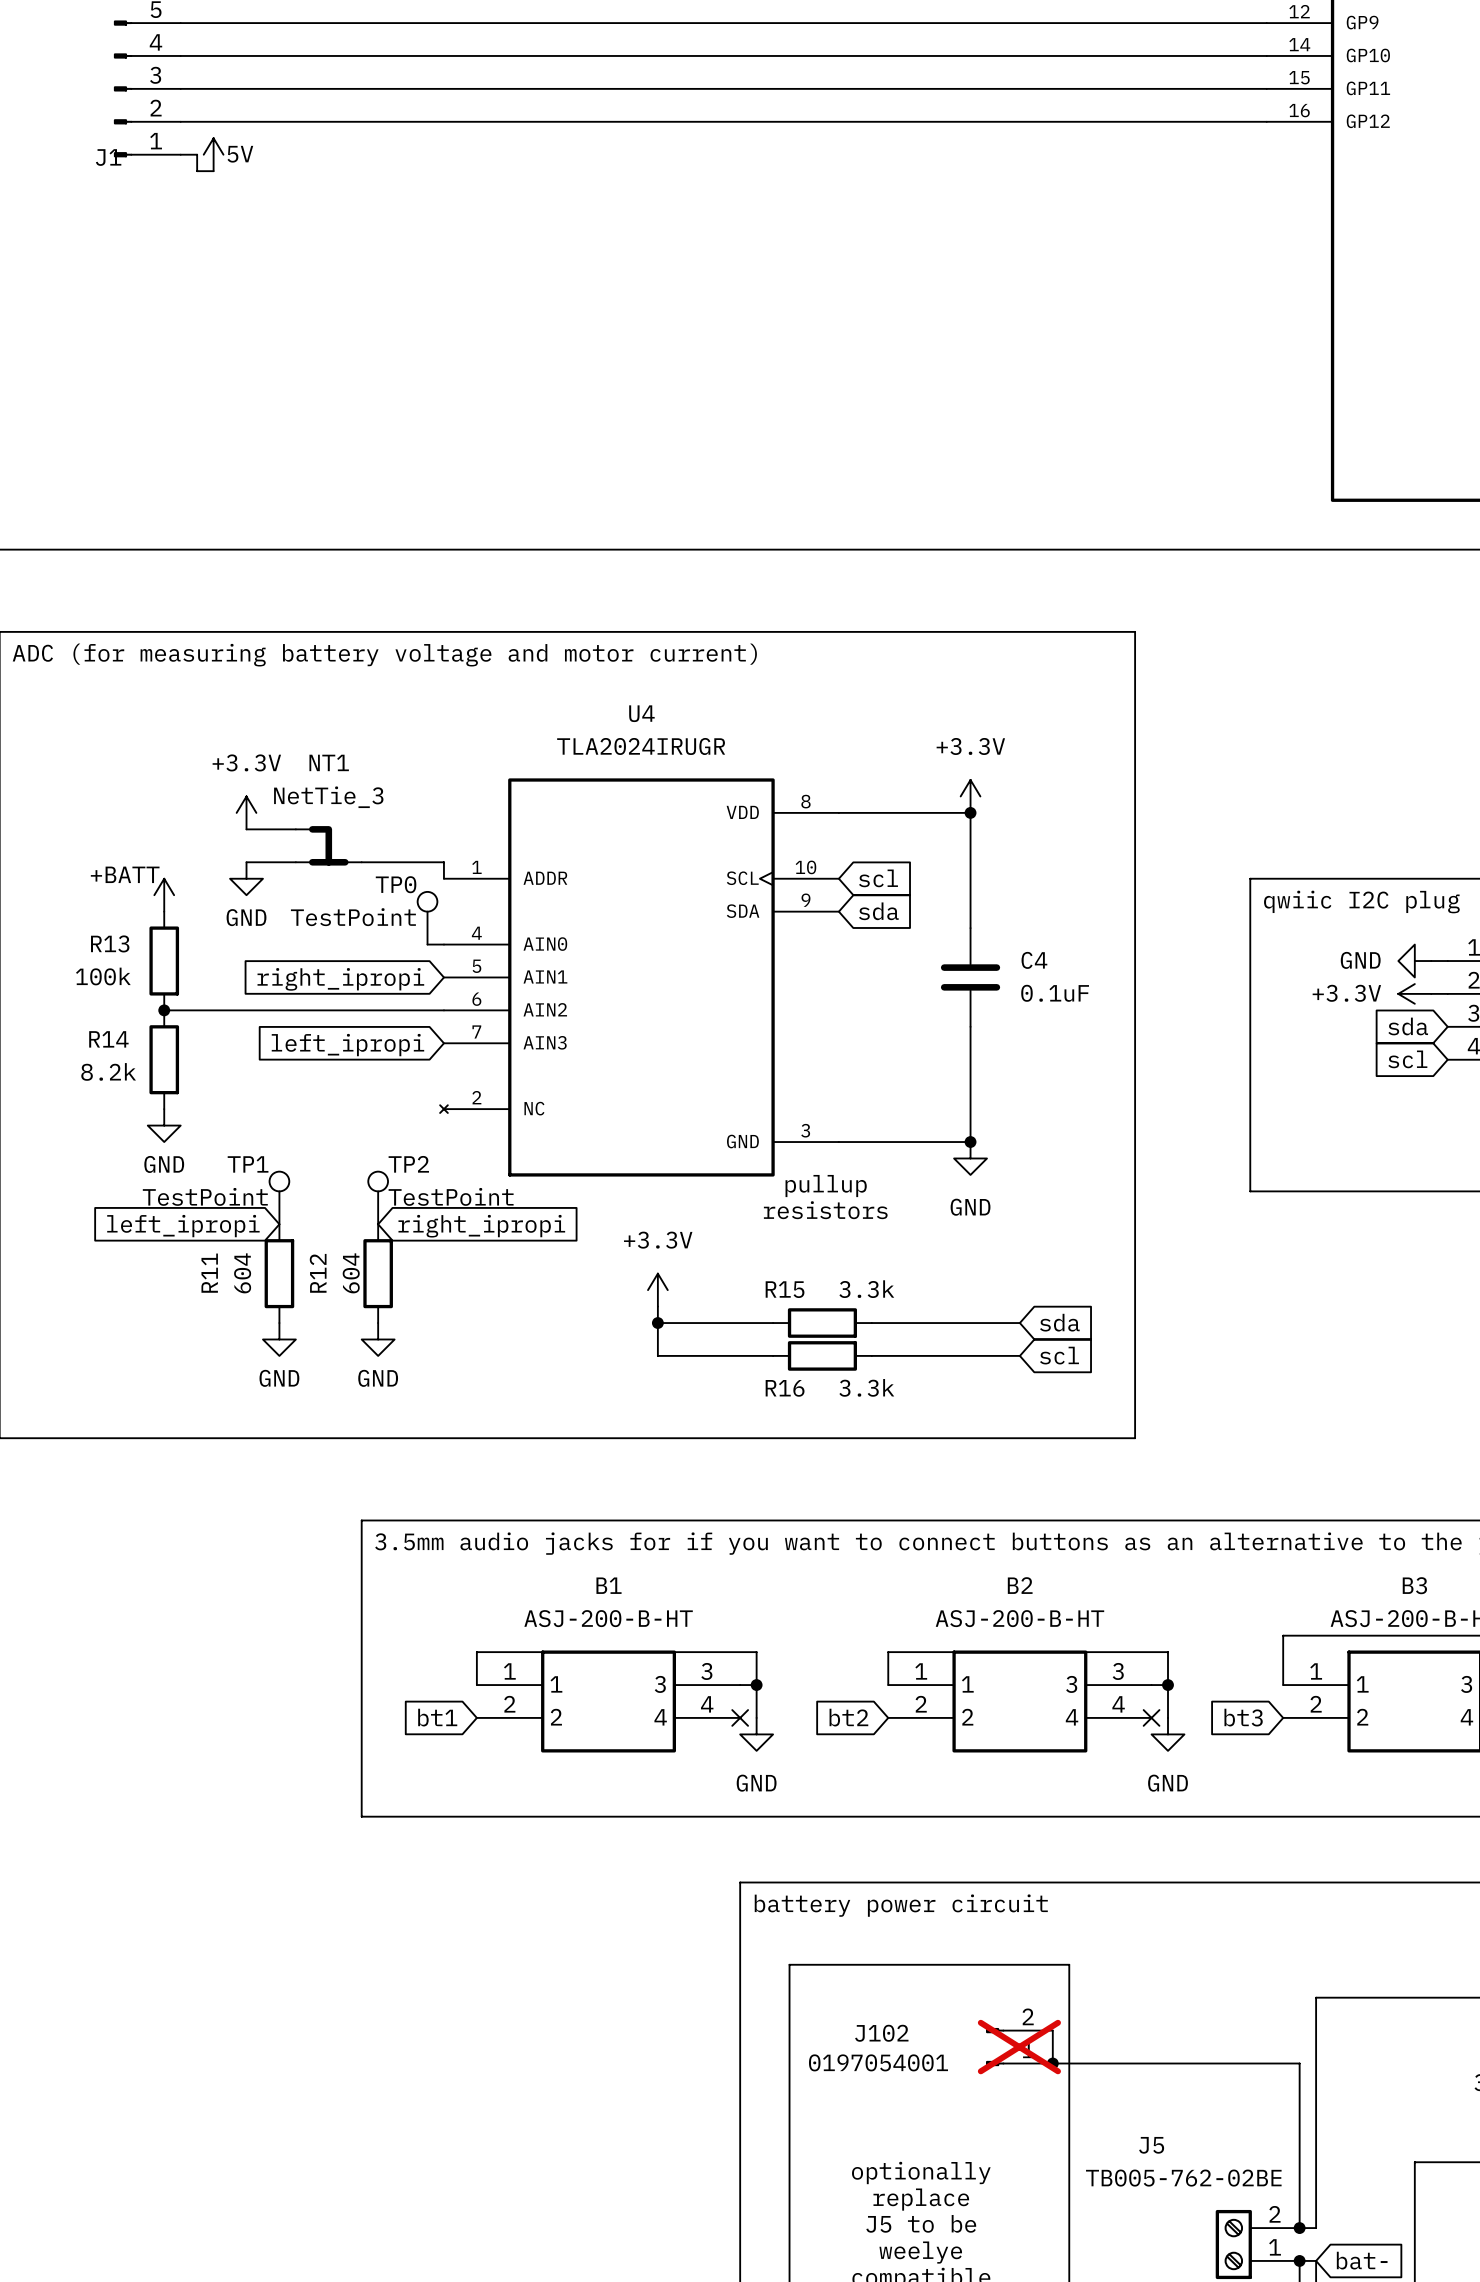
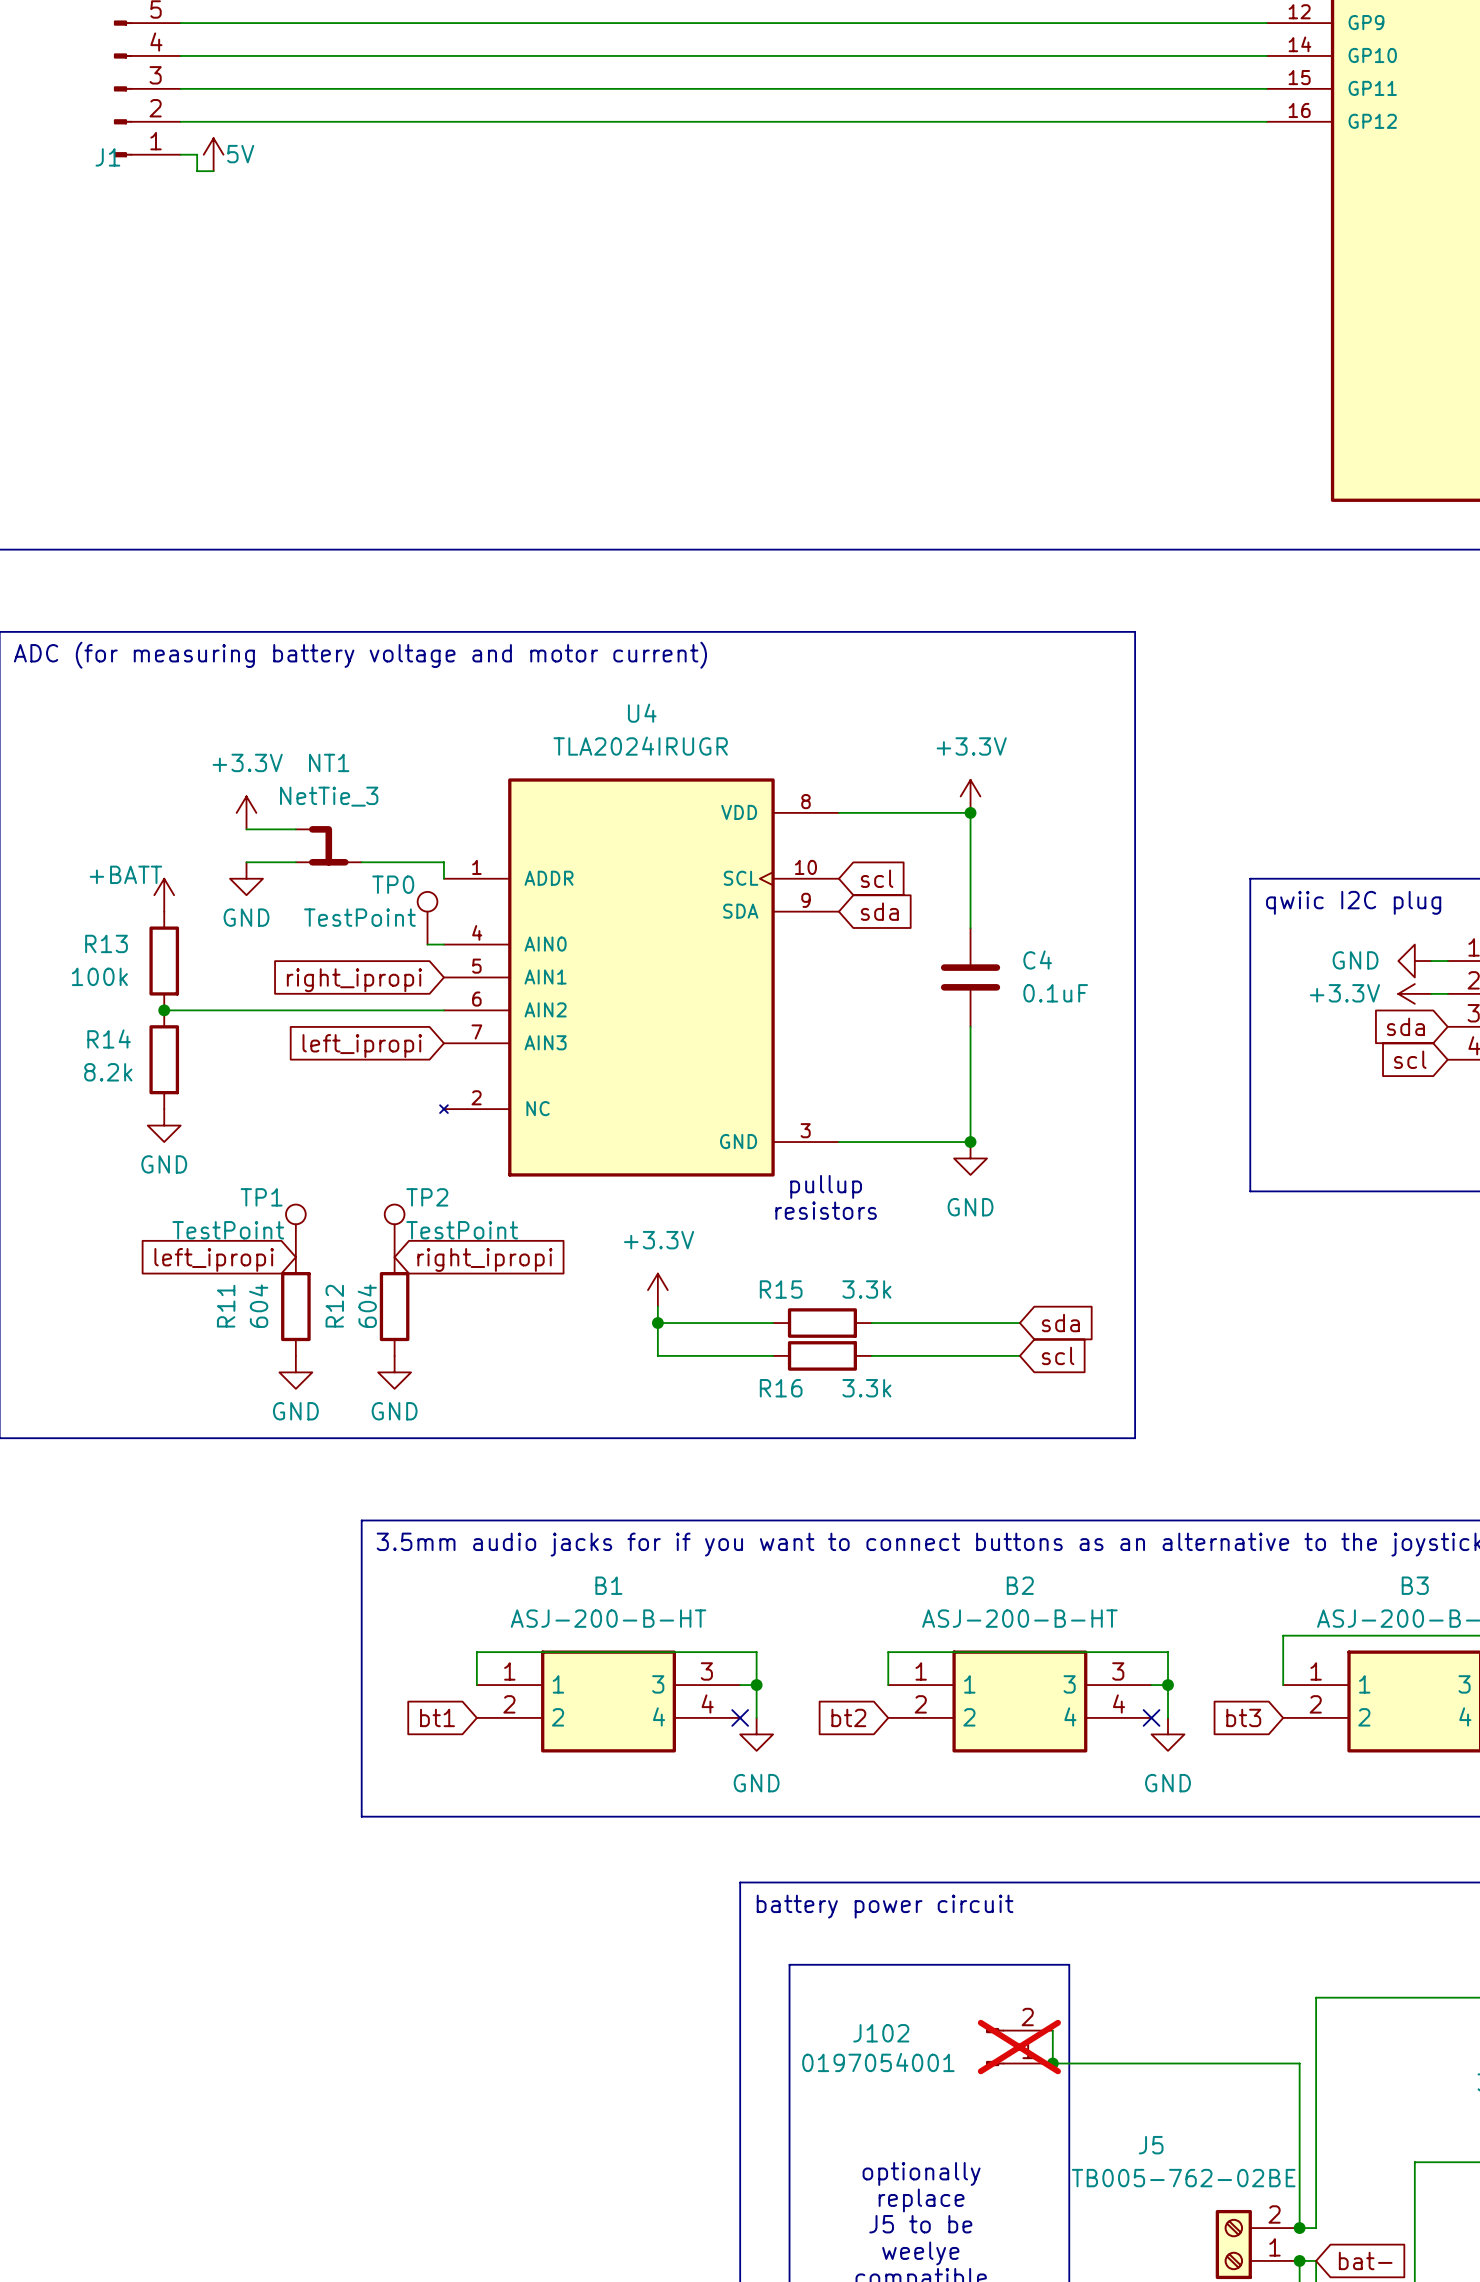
TP1 position: (279, 1197) -> (295, 1230)
TP2 position: (378, 1197) -> (394, 1230)
global label position: left_ipropi (183, 1226) -> left_ipropi (214, 1259)
global label position: right_ipropi (481, 1226) -> right_ipropi (484, 1259)
R11 position: (279, 1273) -> (295, 1306)
R12 position: (378, 1273) -> (394, 1306)
power symbol position: GND (279, 1339) -> GND (295, 1372)
power symbol position: GND (378, 1339) -> GND (394, 1372)

